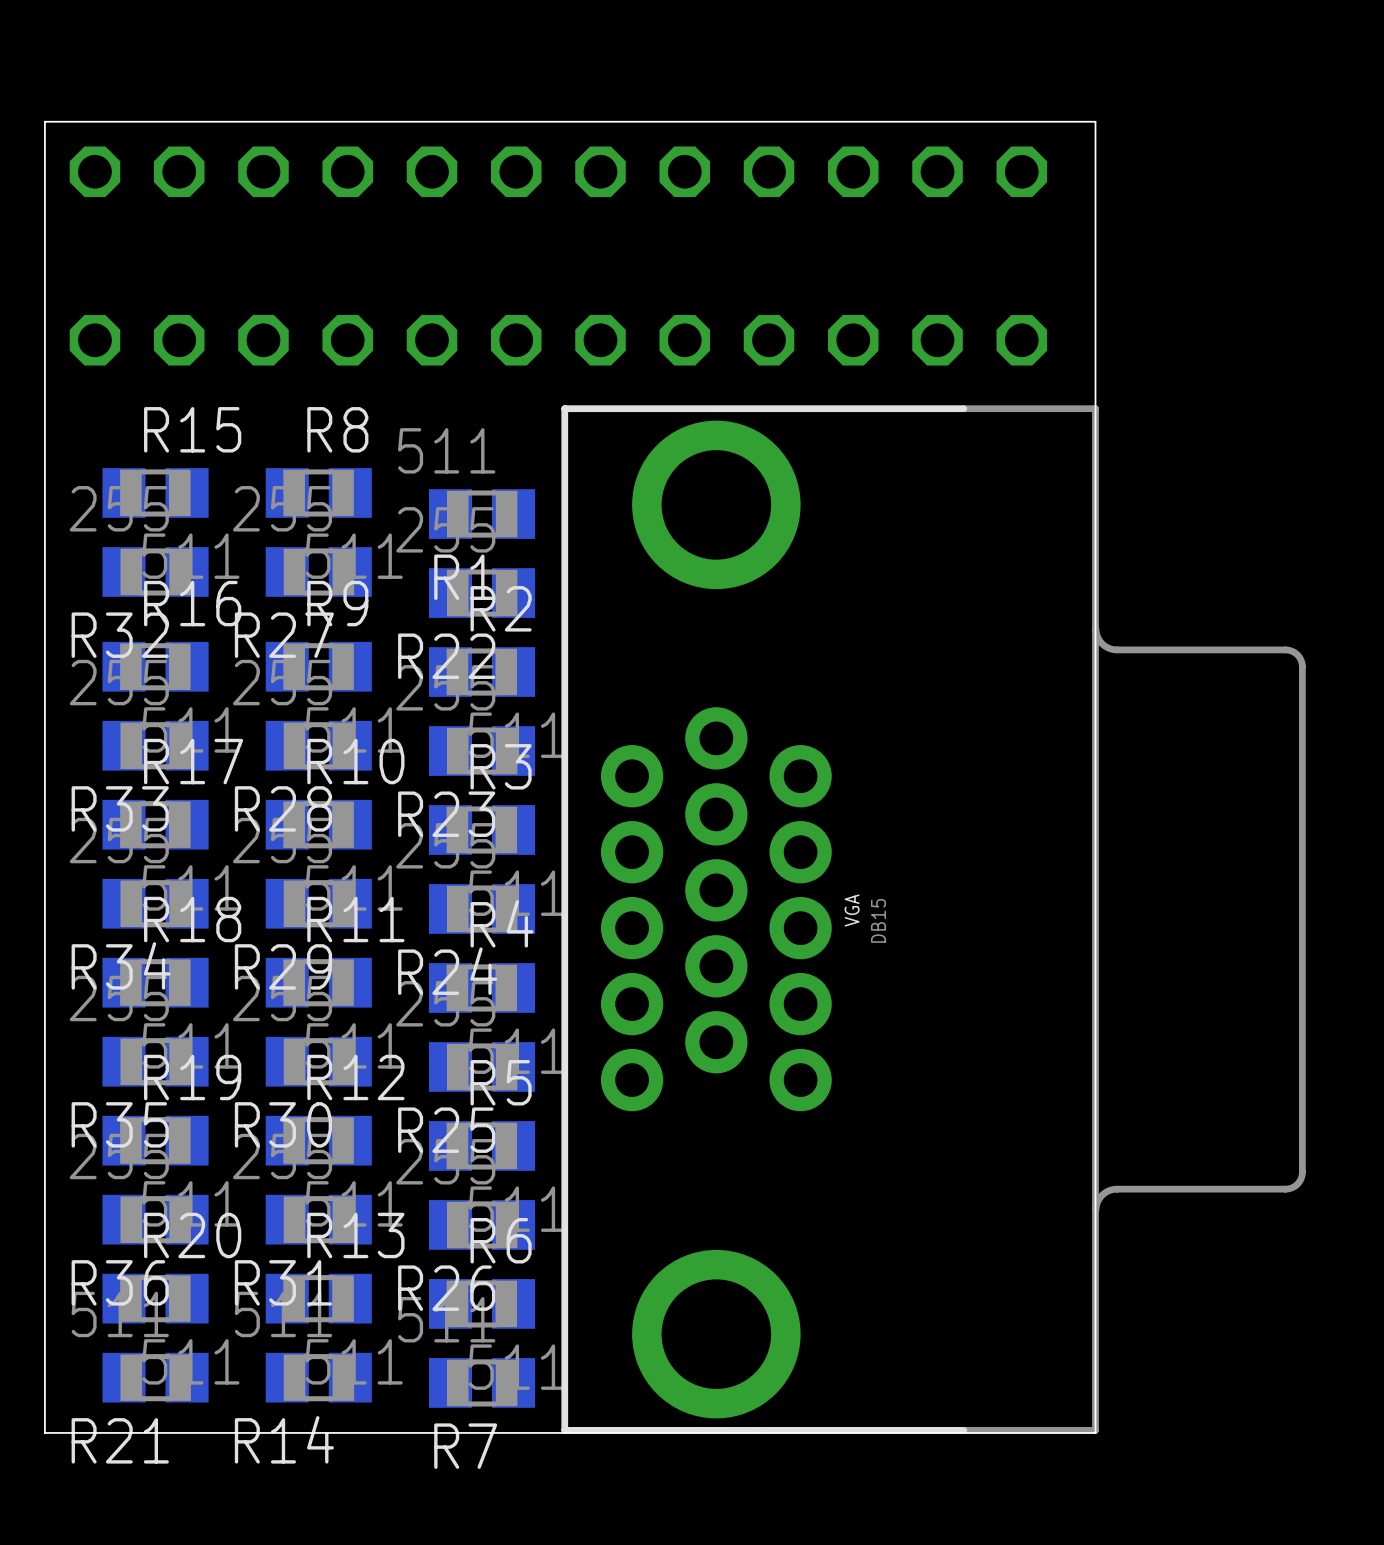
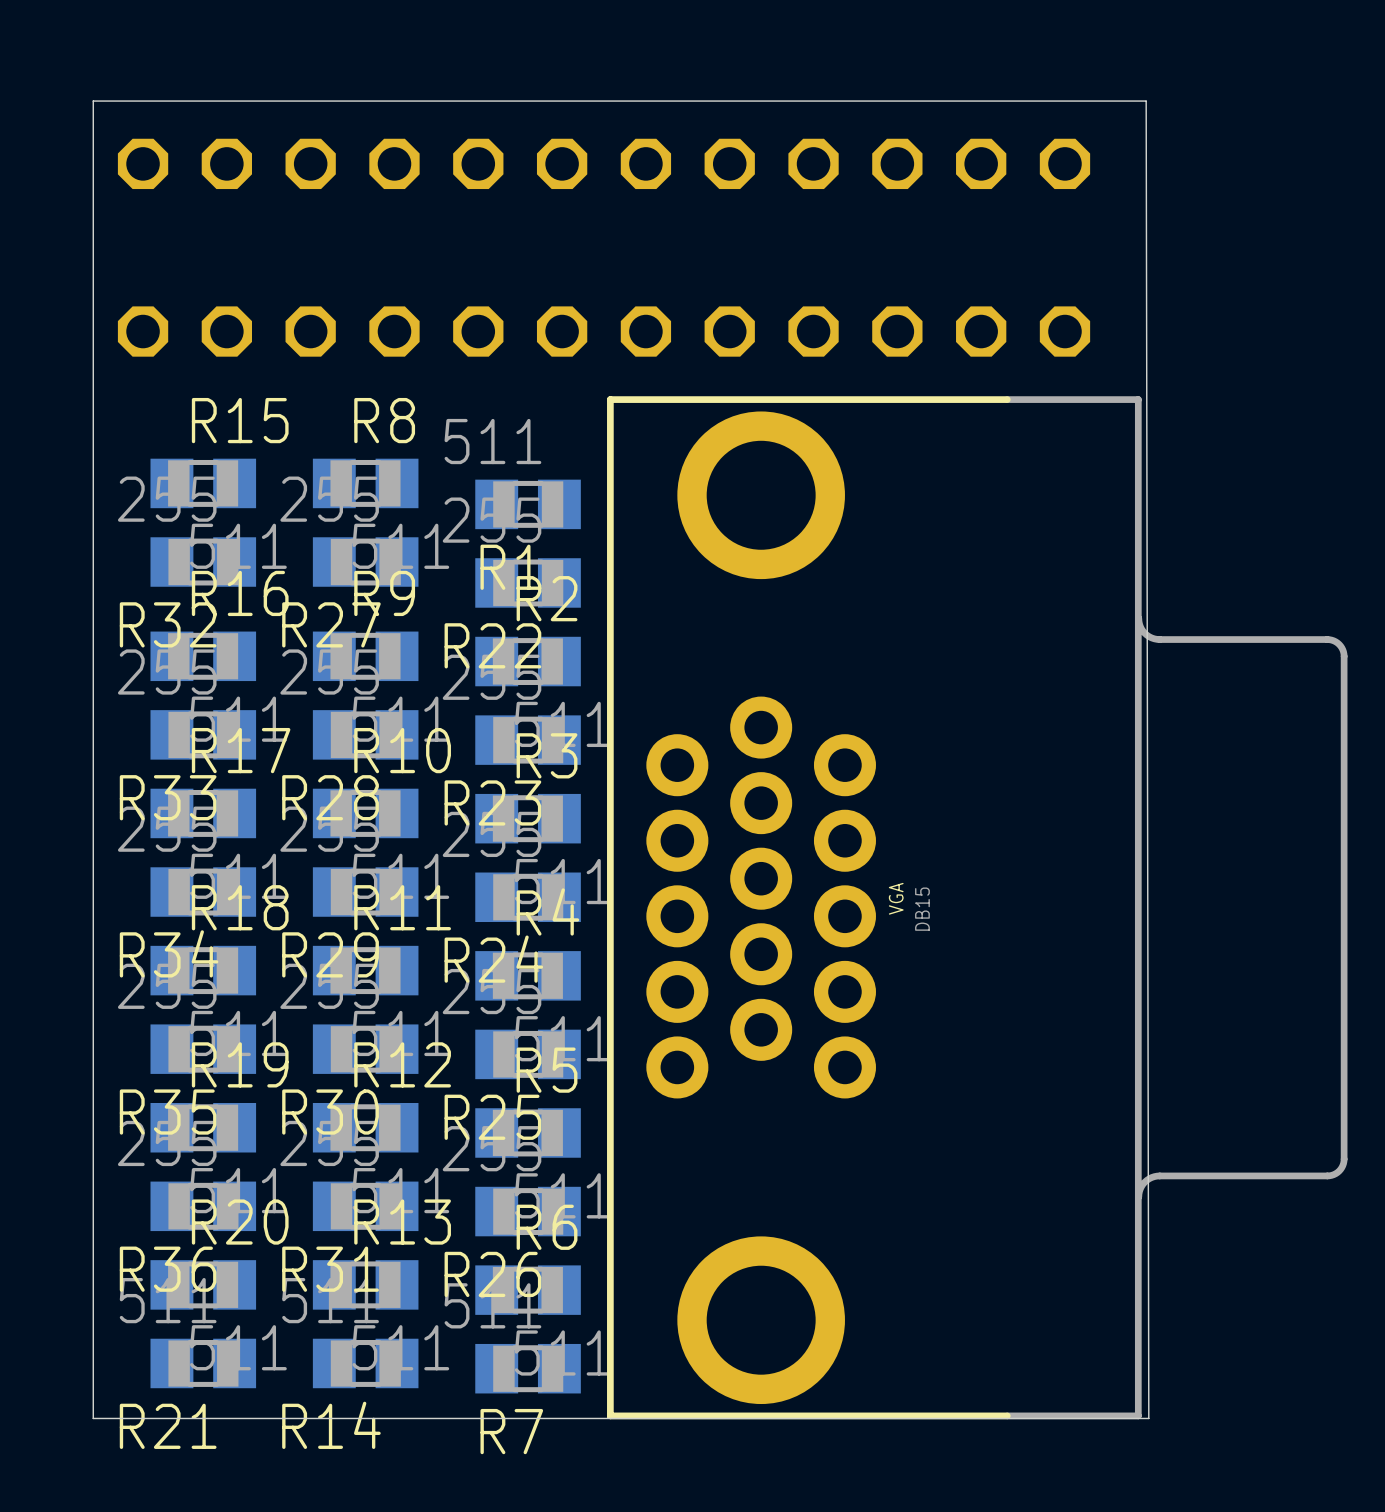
board edge: (1095, 121) (44, 121) -> (1146, 101) (93, 101) (93, 114)
board edge: (1095, 121) (1095, 1432) -> (1146, 101) (1148, 1418) (1138, 1418)

